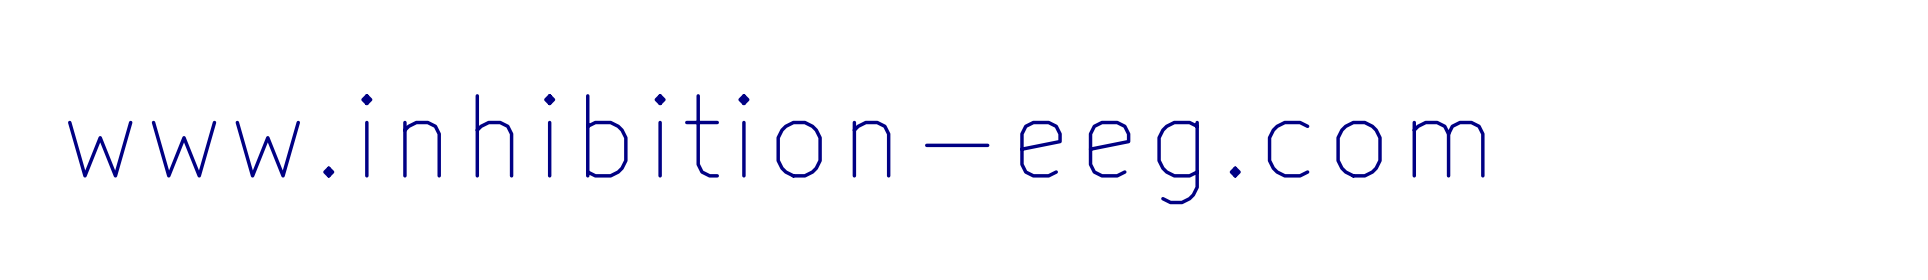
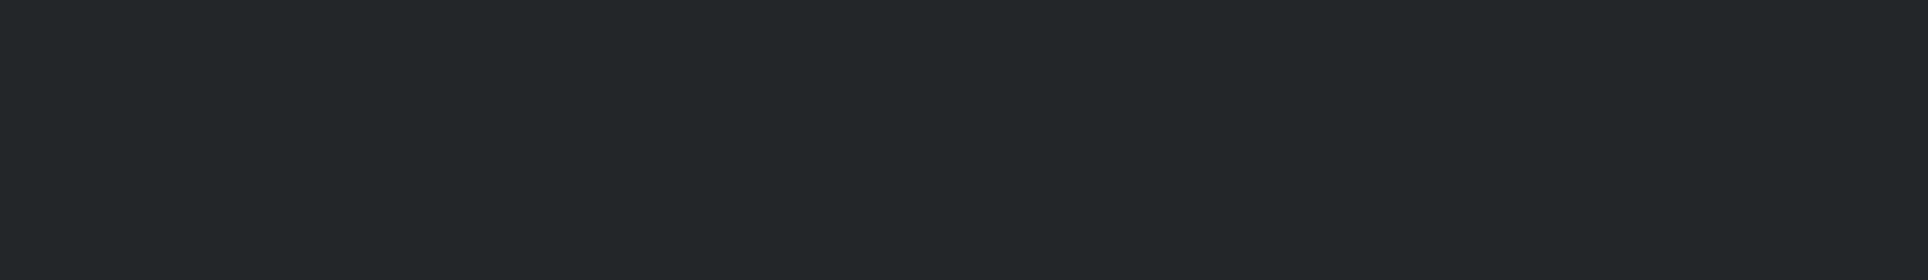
text: www.inhibition-eeg.com (776, 149) -> none

